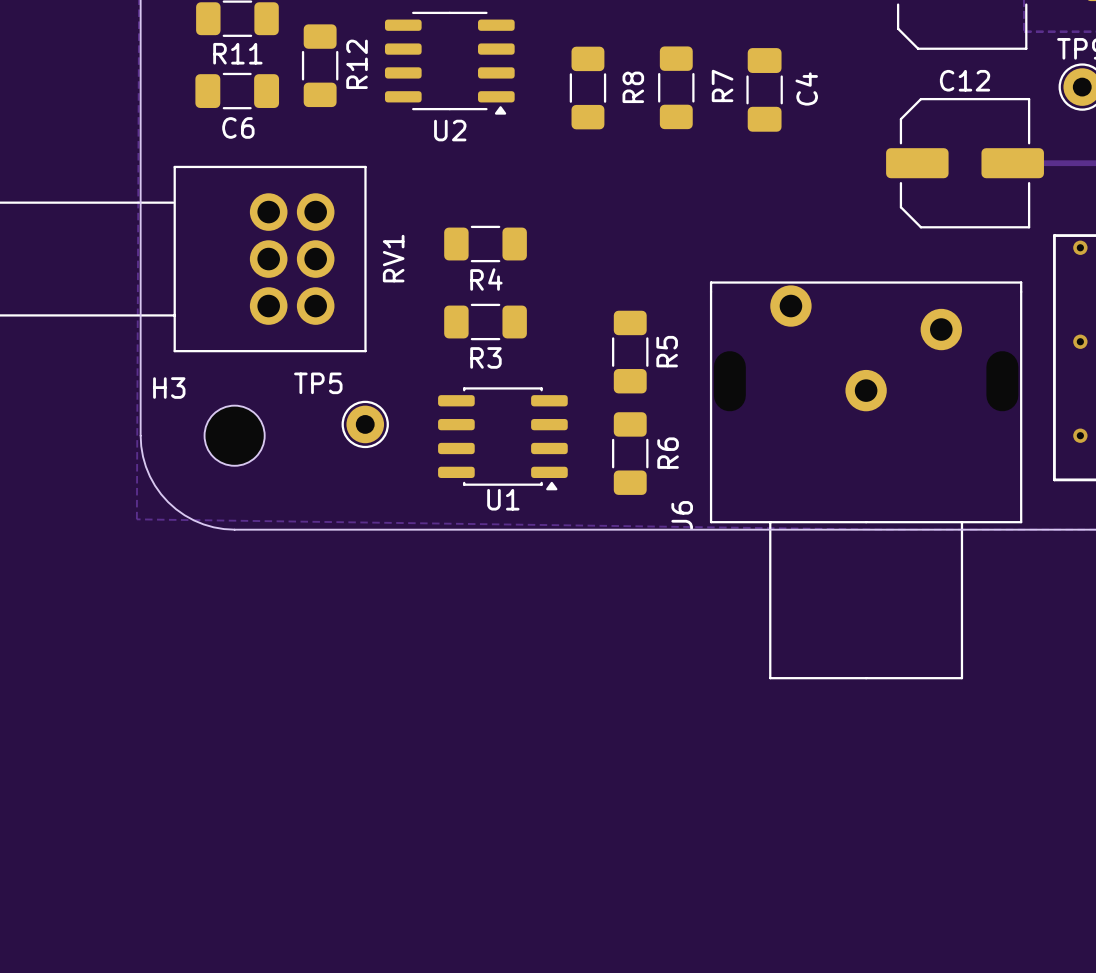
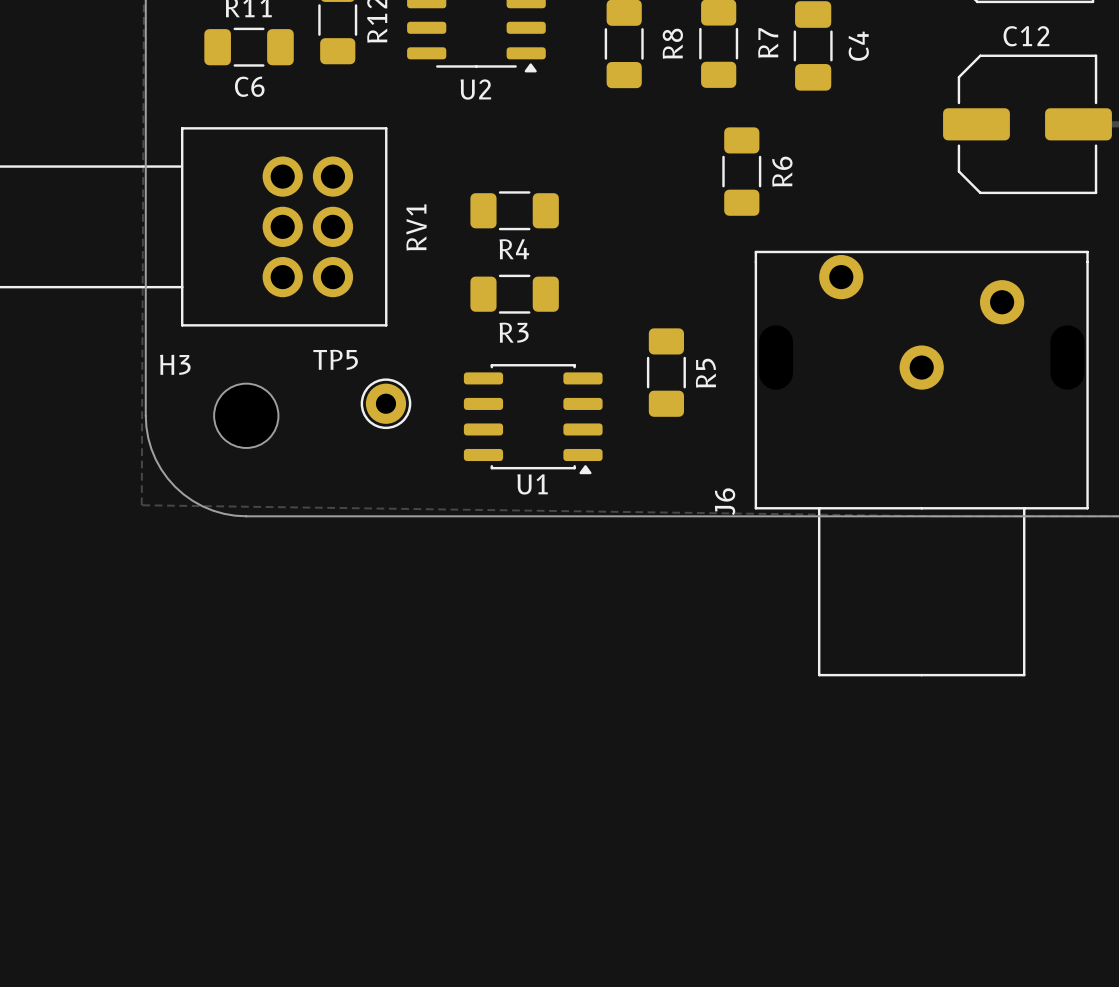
R5 position: (630, 352) -> (666, 372)
R6 position: (630, 453) -> (741, 171)

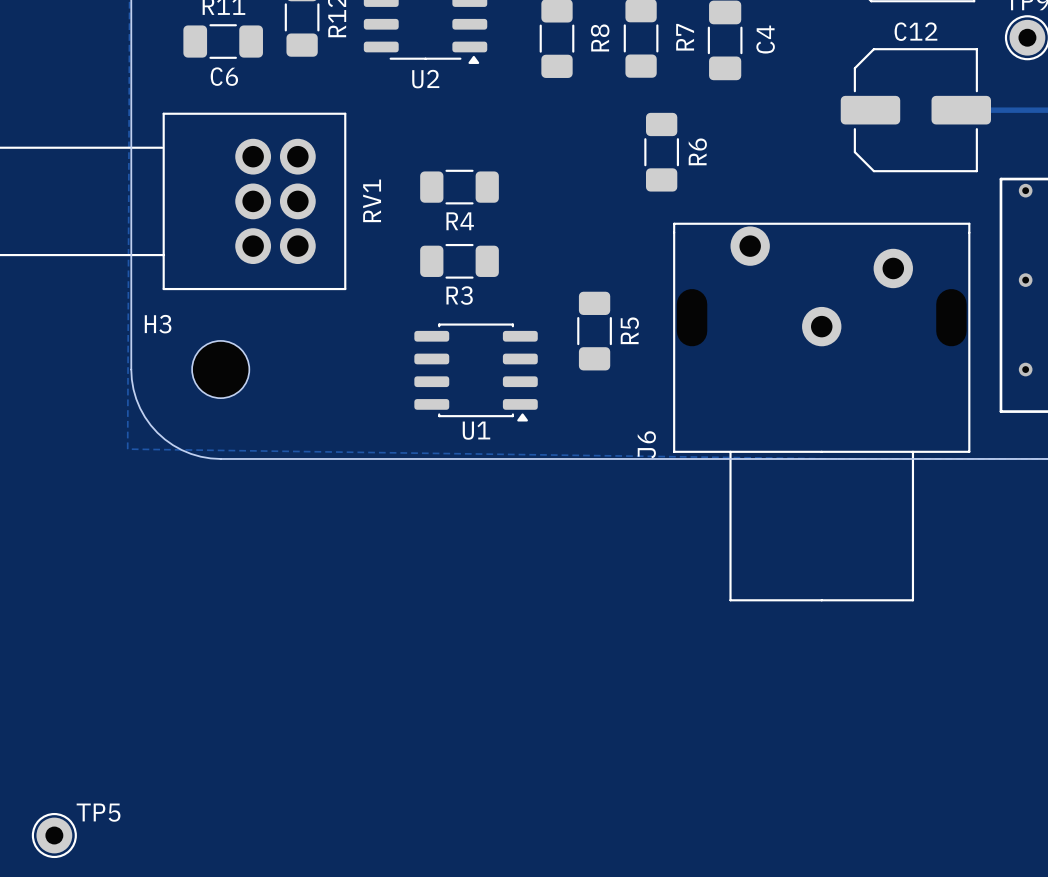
TP5 name position: TP5 (335, 359) -> TP5 (98, 812)
TP5 position: (385, 403) -> (54, 835)

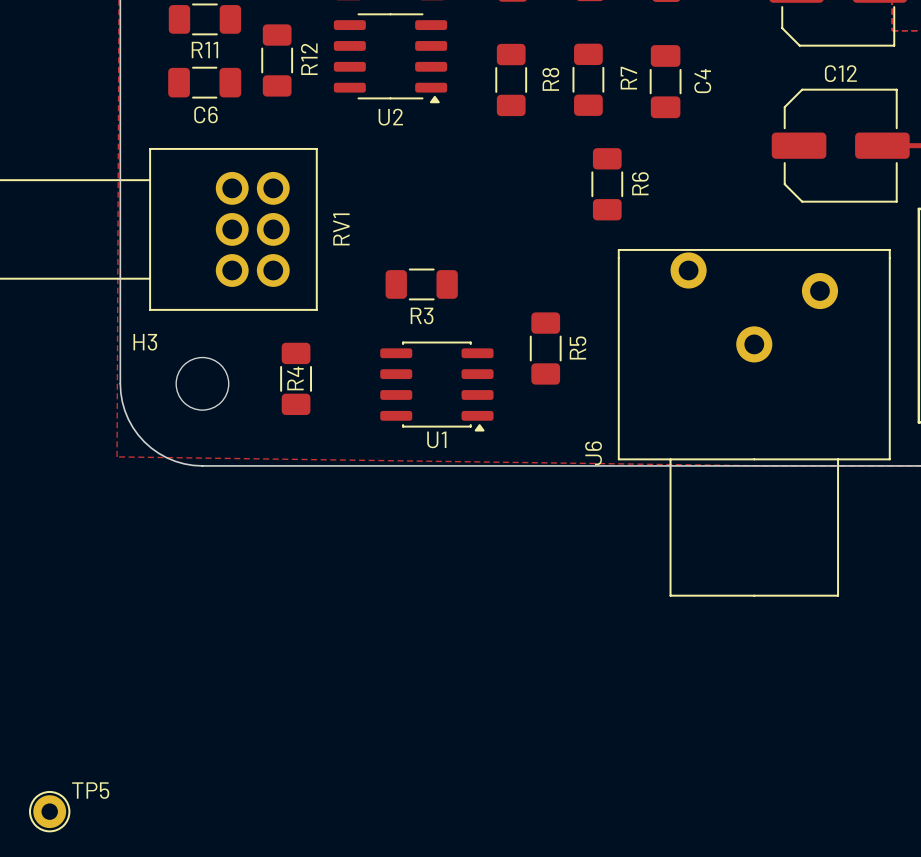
R4 rotation: 0° (459, 187) -> 90° clockwise (296, 378)
R4 position: (459, 187) -> (296, 378)

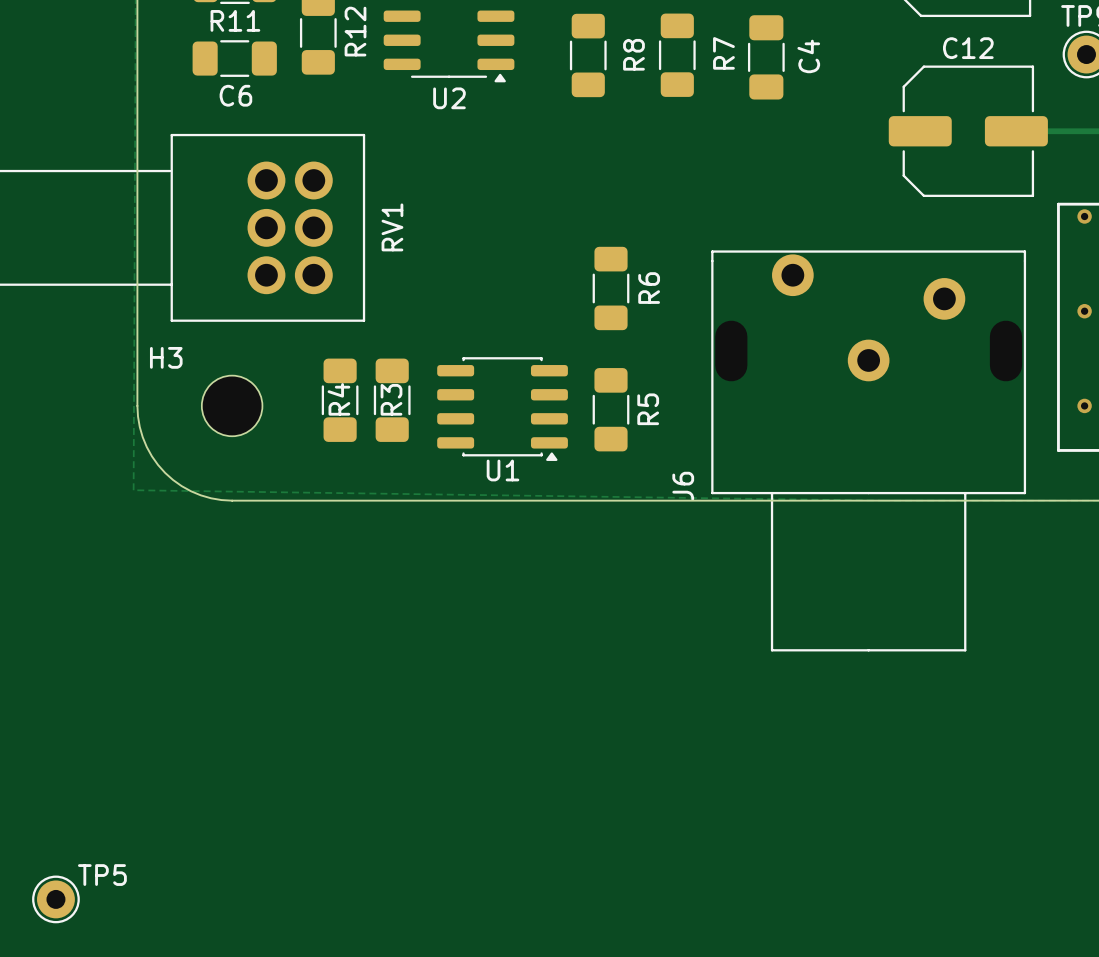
R6 position: (607, 184) -> (611, 288)
R3 rotation: 0° (421, 284) -> 90° clockwise (392, 400)
R3 position: (421, 284) -> (392, 400)
R5 position: (545, 348) -> (611, 409)

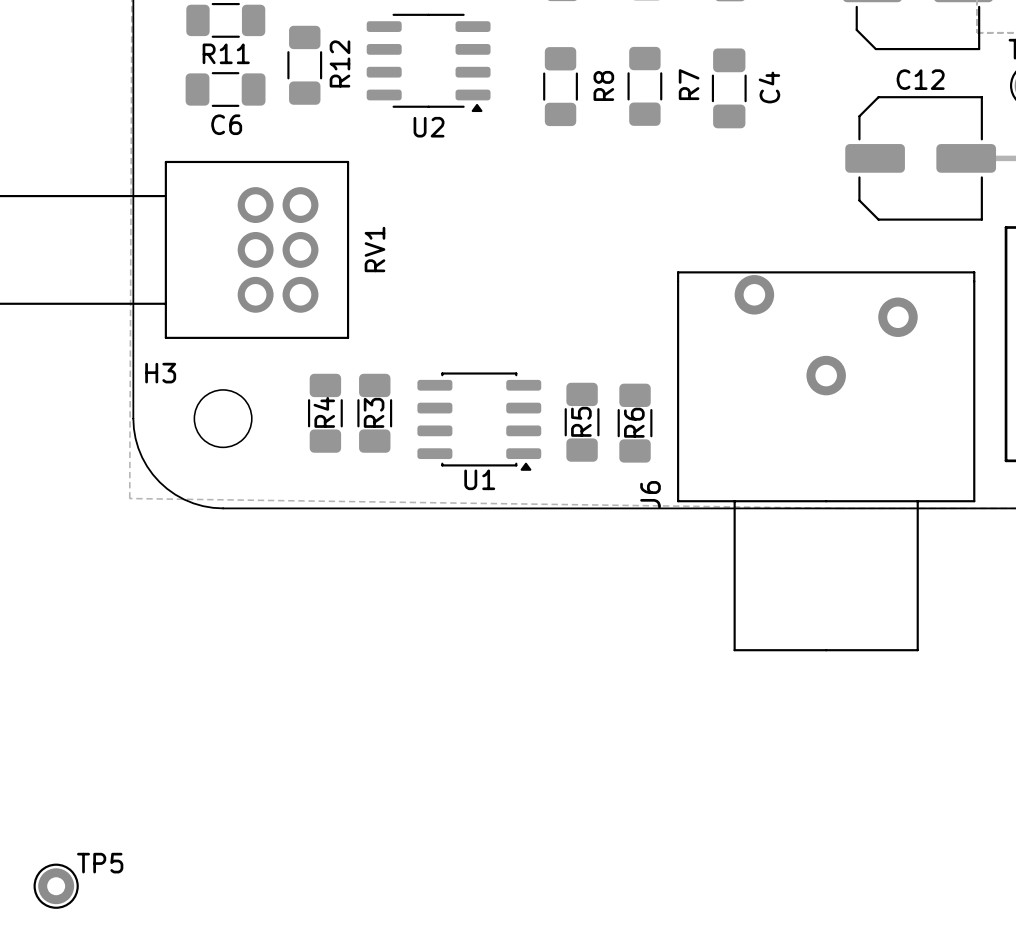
R6 position: (611, 288) -> (635, 423)
R6 name position: R6 (649, 288) -> R6 (634, 422)
R5 name position: R5 (648, 409) -> R5 (581, 421)

